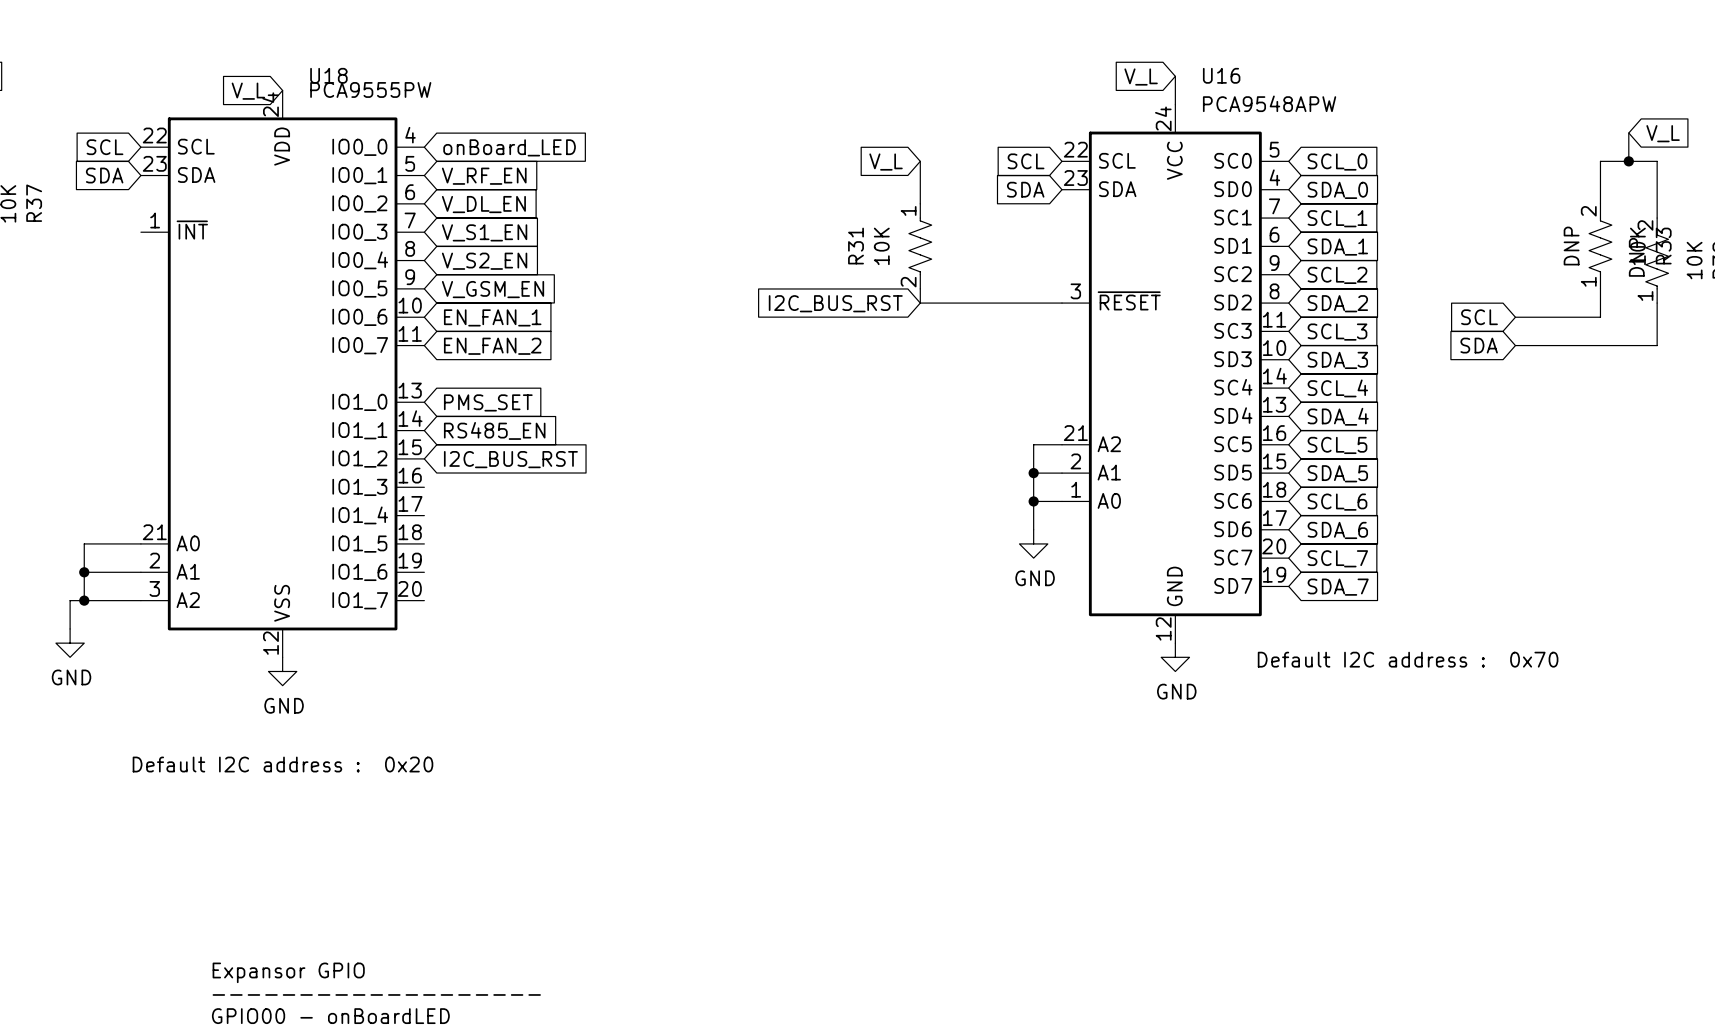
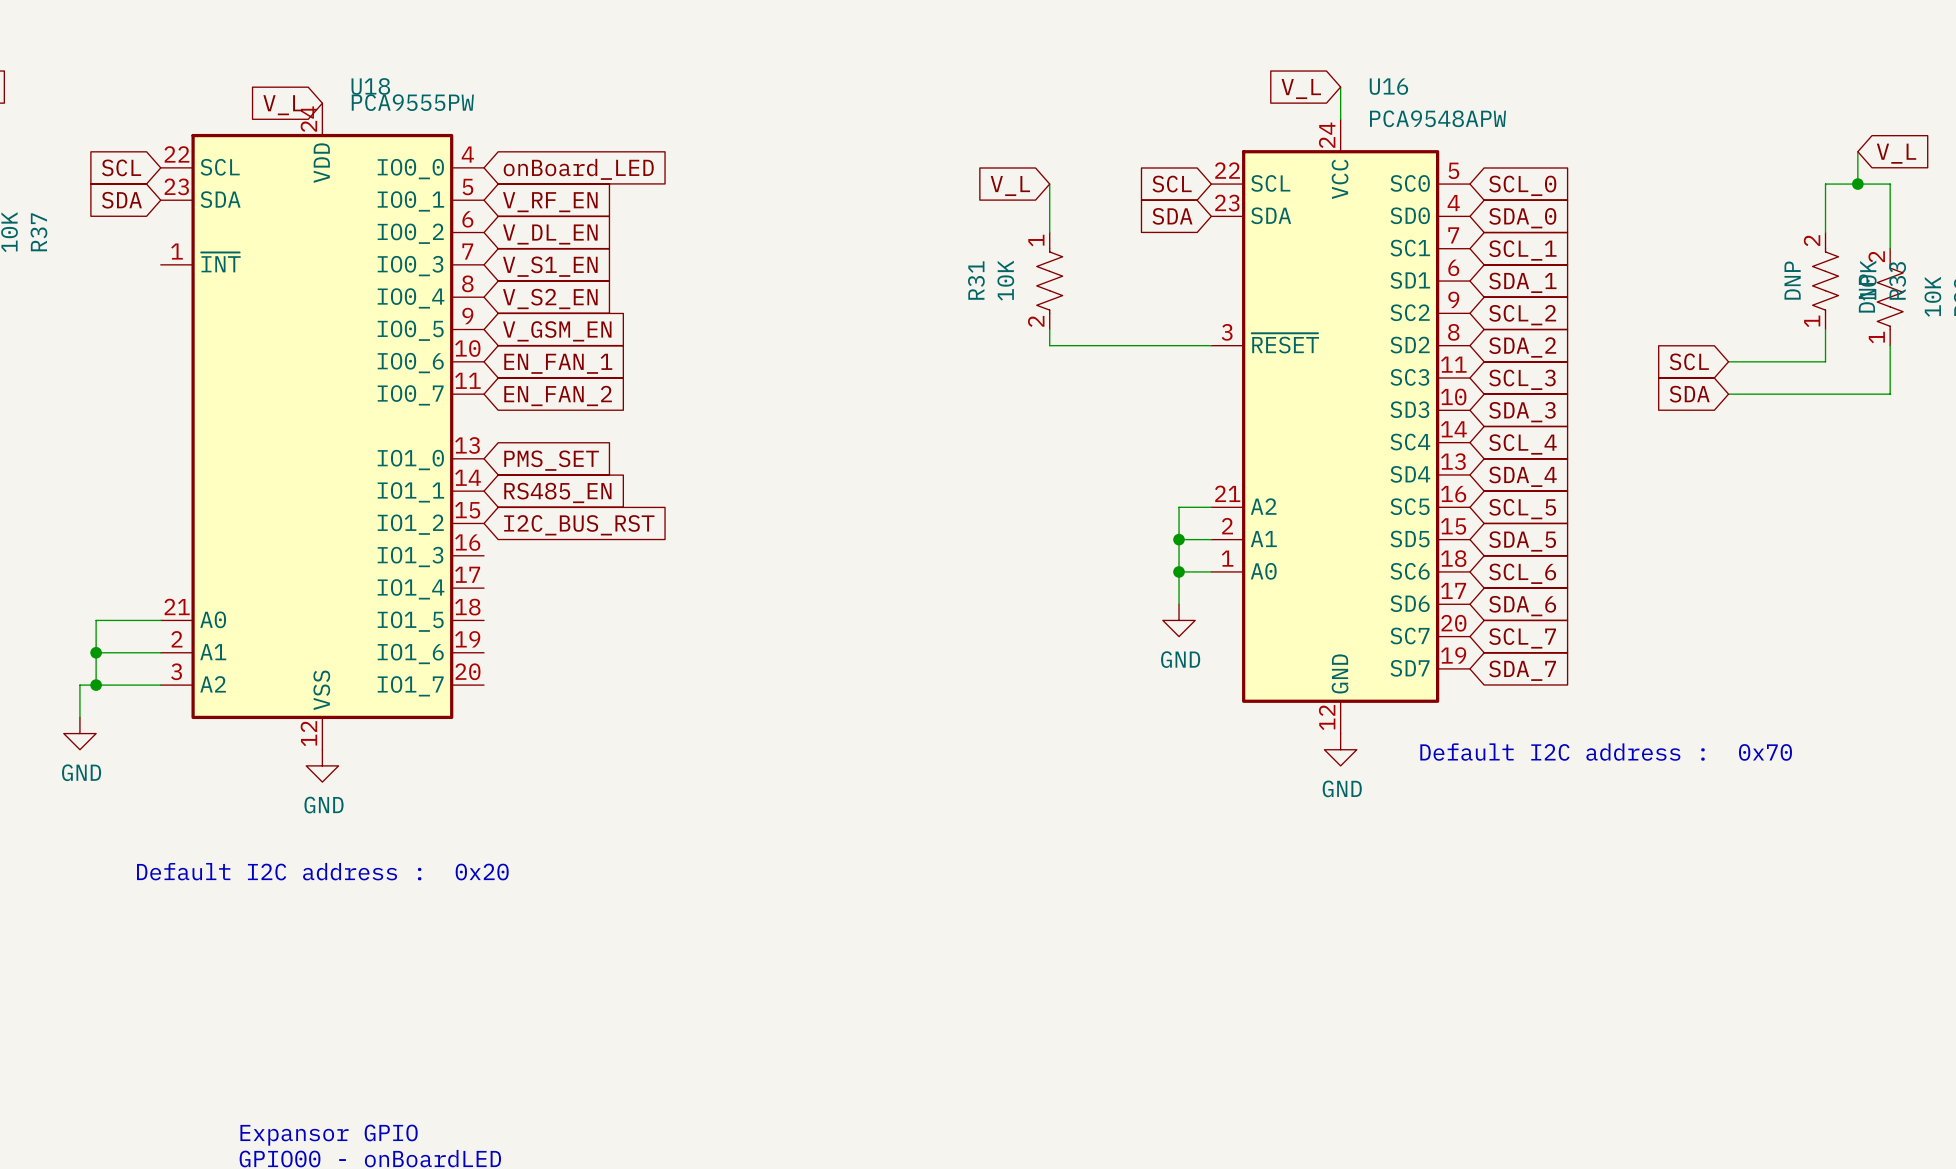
global label: I2C_BUS_RST (835, 303) -> none
text: Expansor GPIO (288, 972) -> none
text: ------------------- (376, 994) -> Expansor GPIO (329, 1135)

